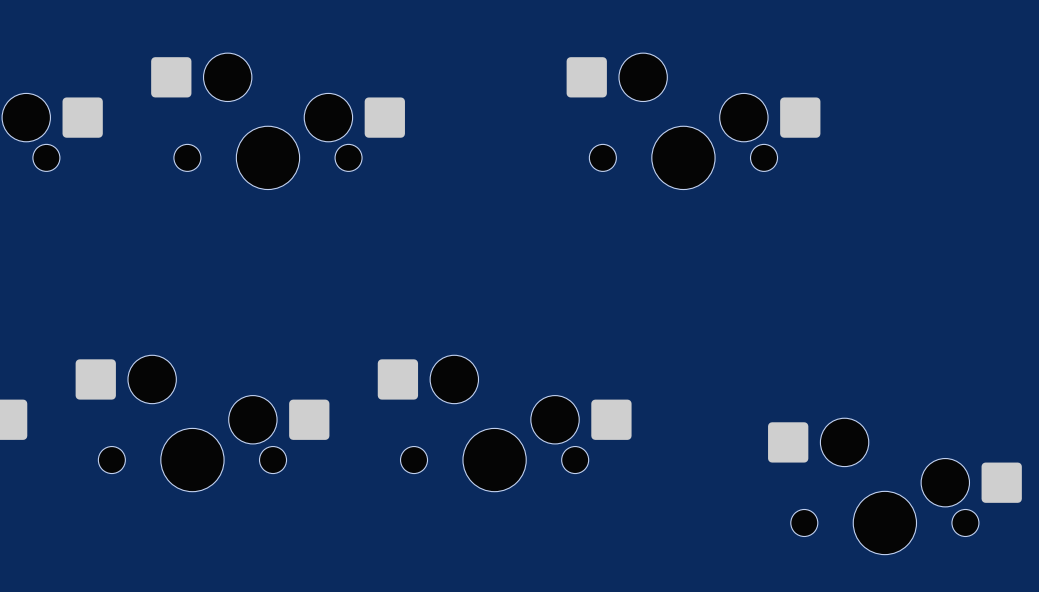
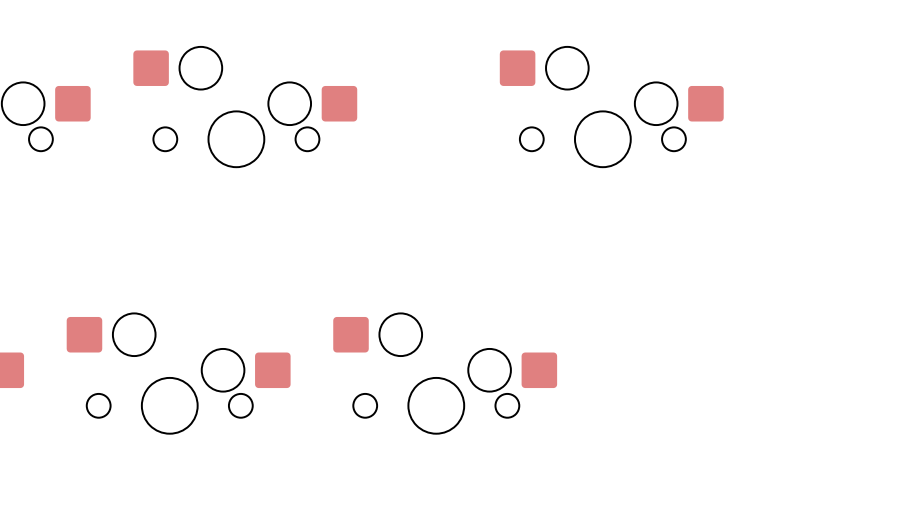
part: (894, 486) -> none

